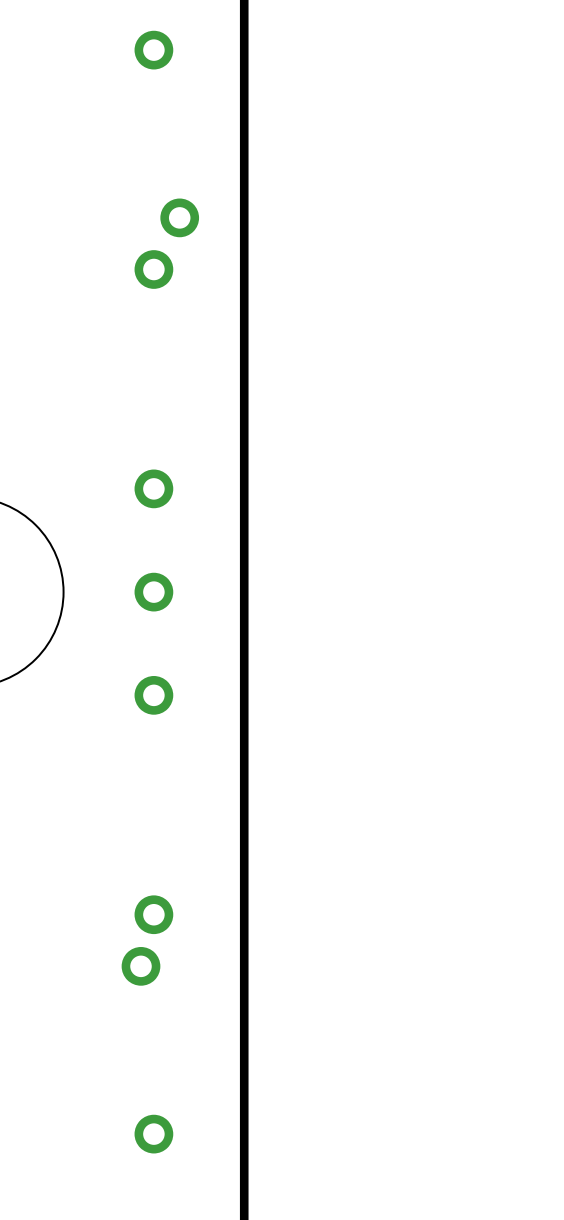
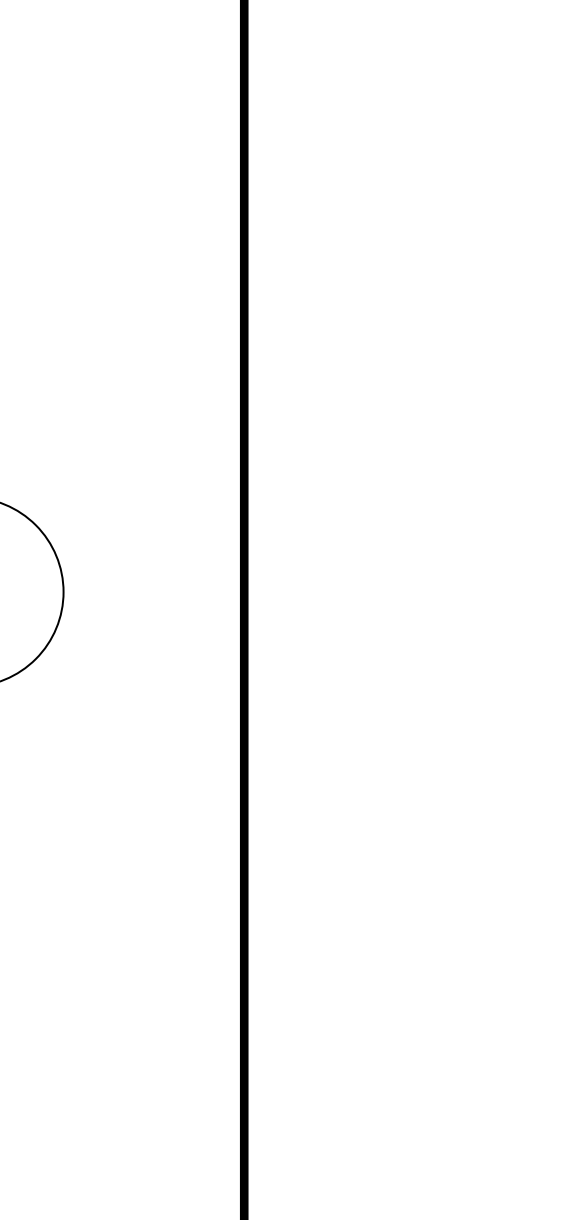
via: (153, 50) -> none
via: (179, 217) -> none
via: (153, 269) -> none
via: (153, 488) -> none
via: (153, 592) -> none
via: (153, 695) -> none
via: (153, 914) -> none
via: (140, 966) -> none
via: (153, 1134) -> none

